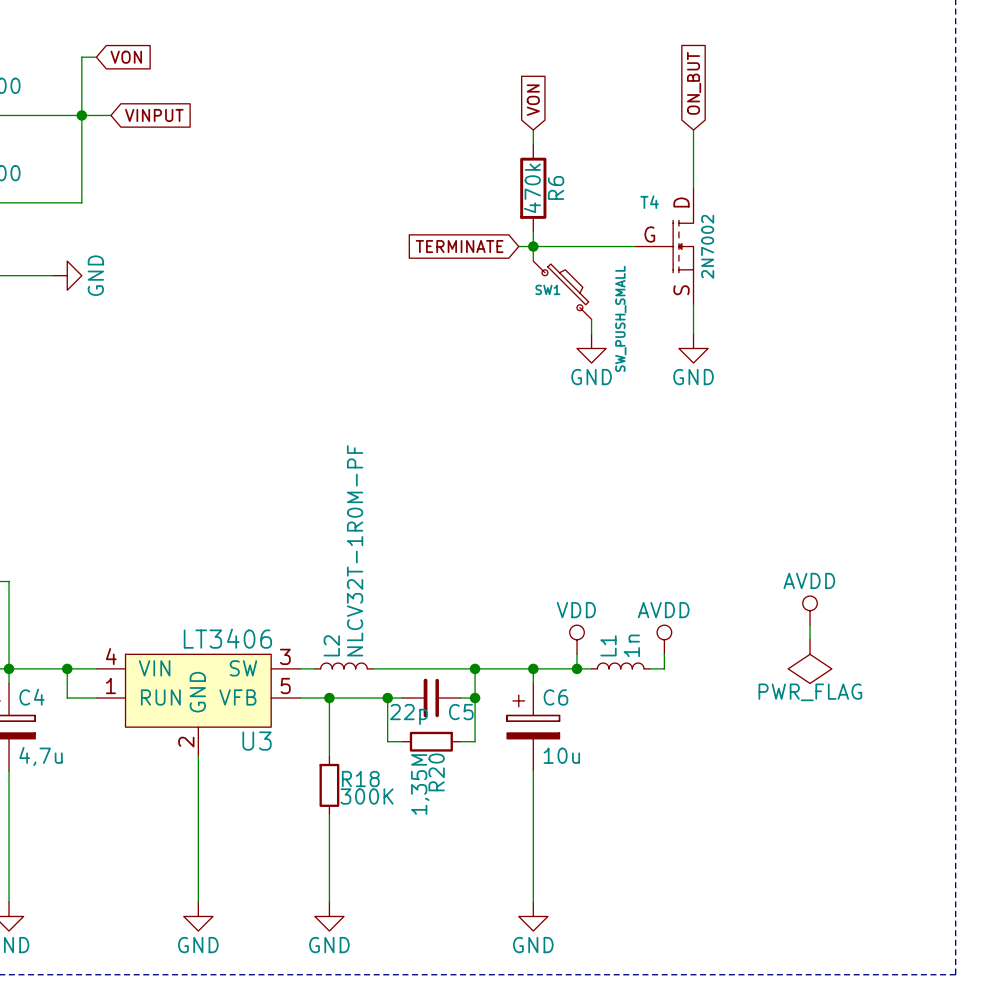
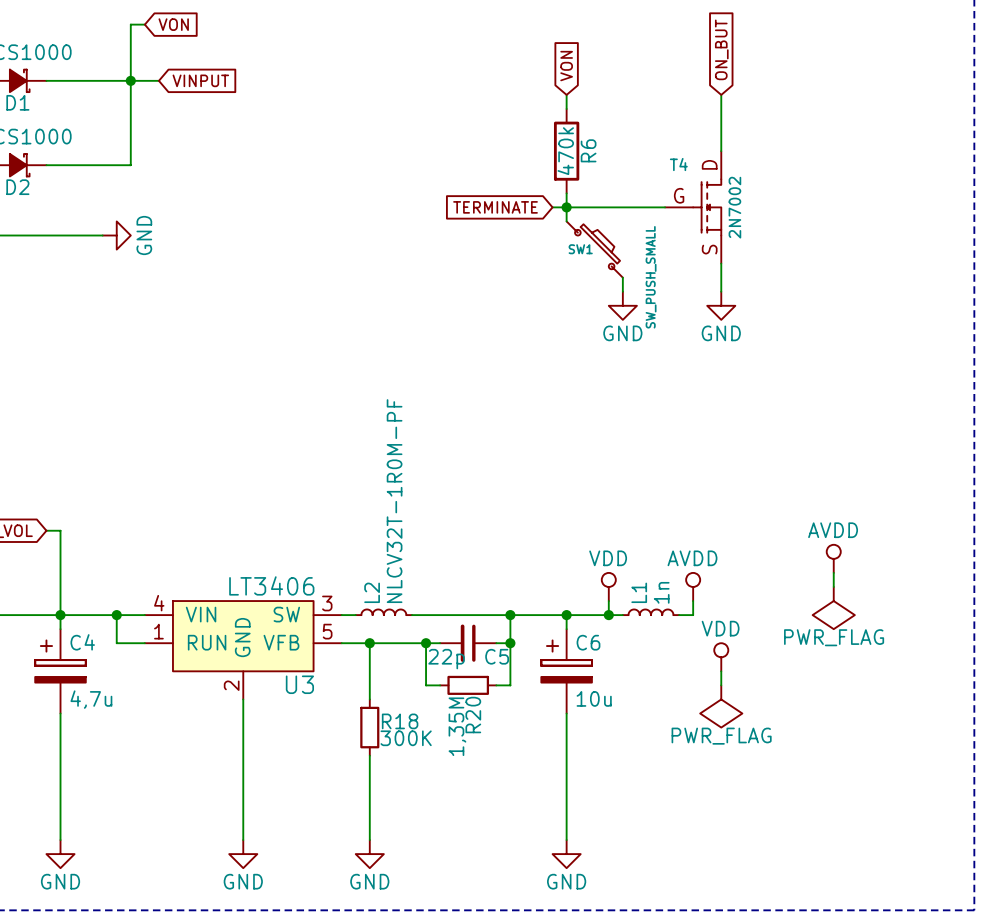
power symbol: none -> VDD (721, 657)
wire: none -> (721, 671) (721, 685)
power symbol: none -> PWR_FLAG (721, 706)

